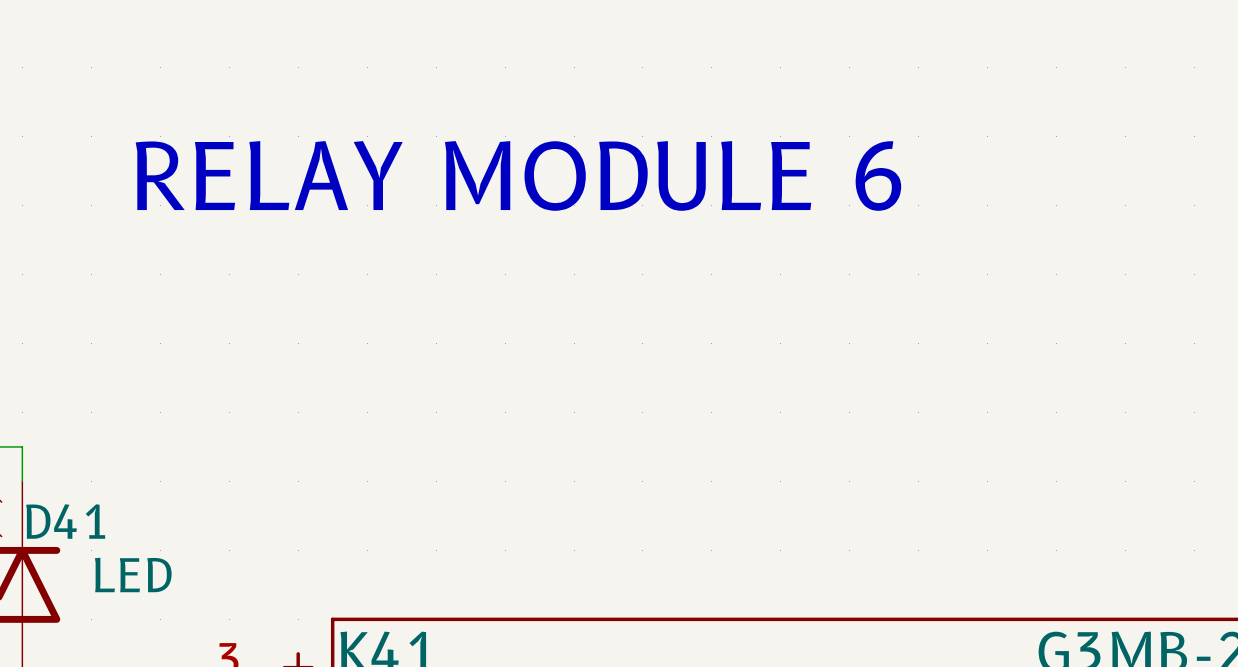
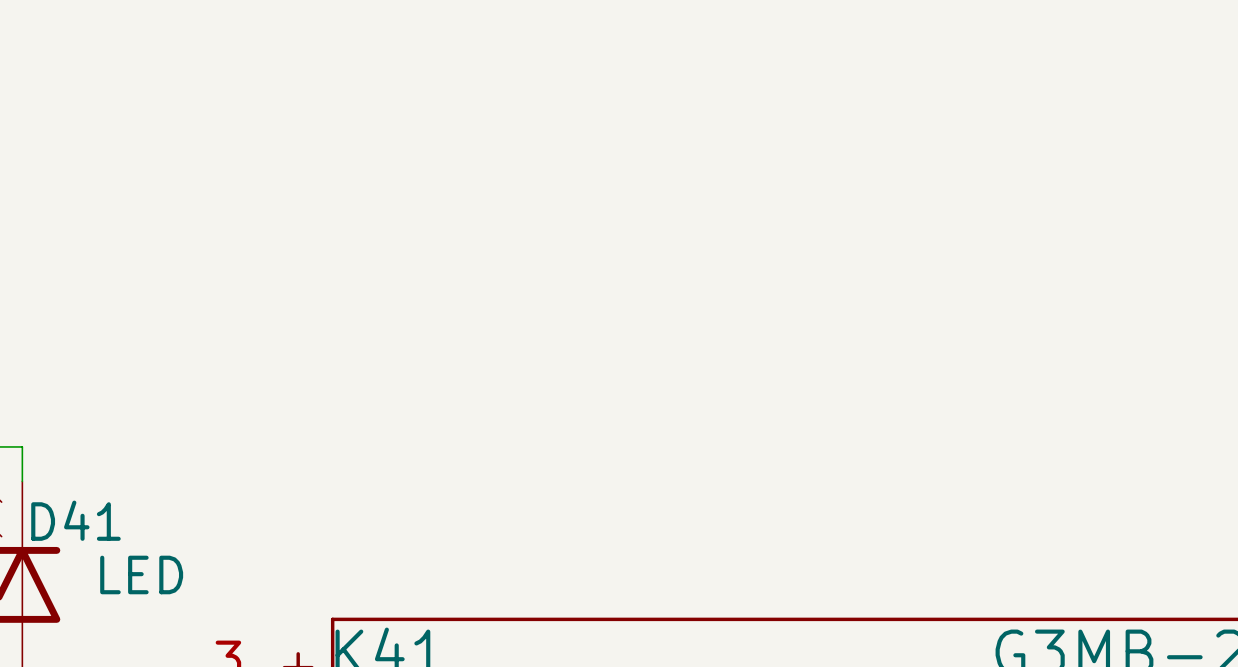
text: RELAY MODULE 6 (518, 175) -> none

